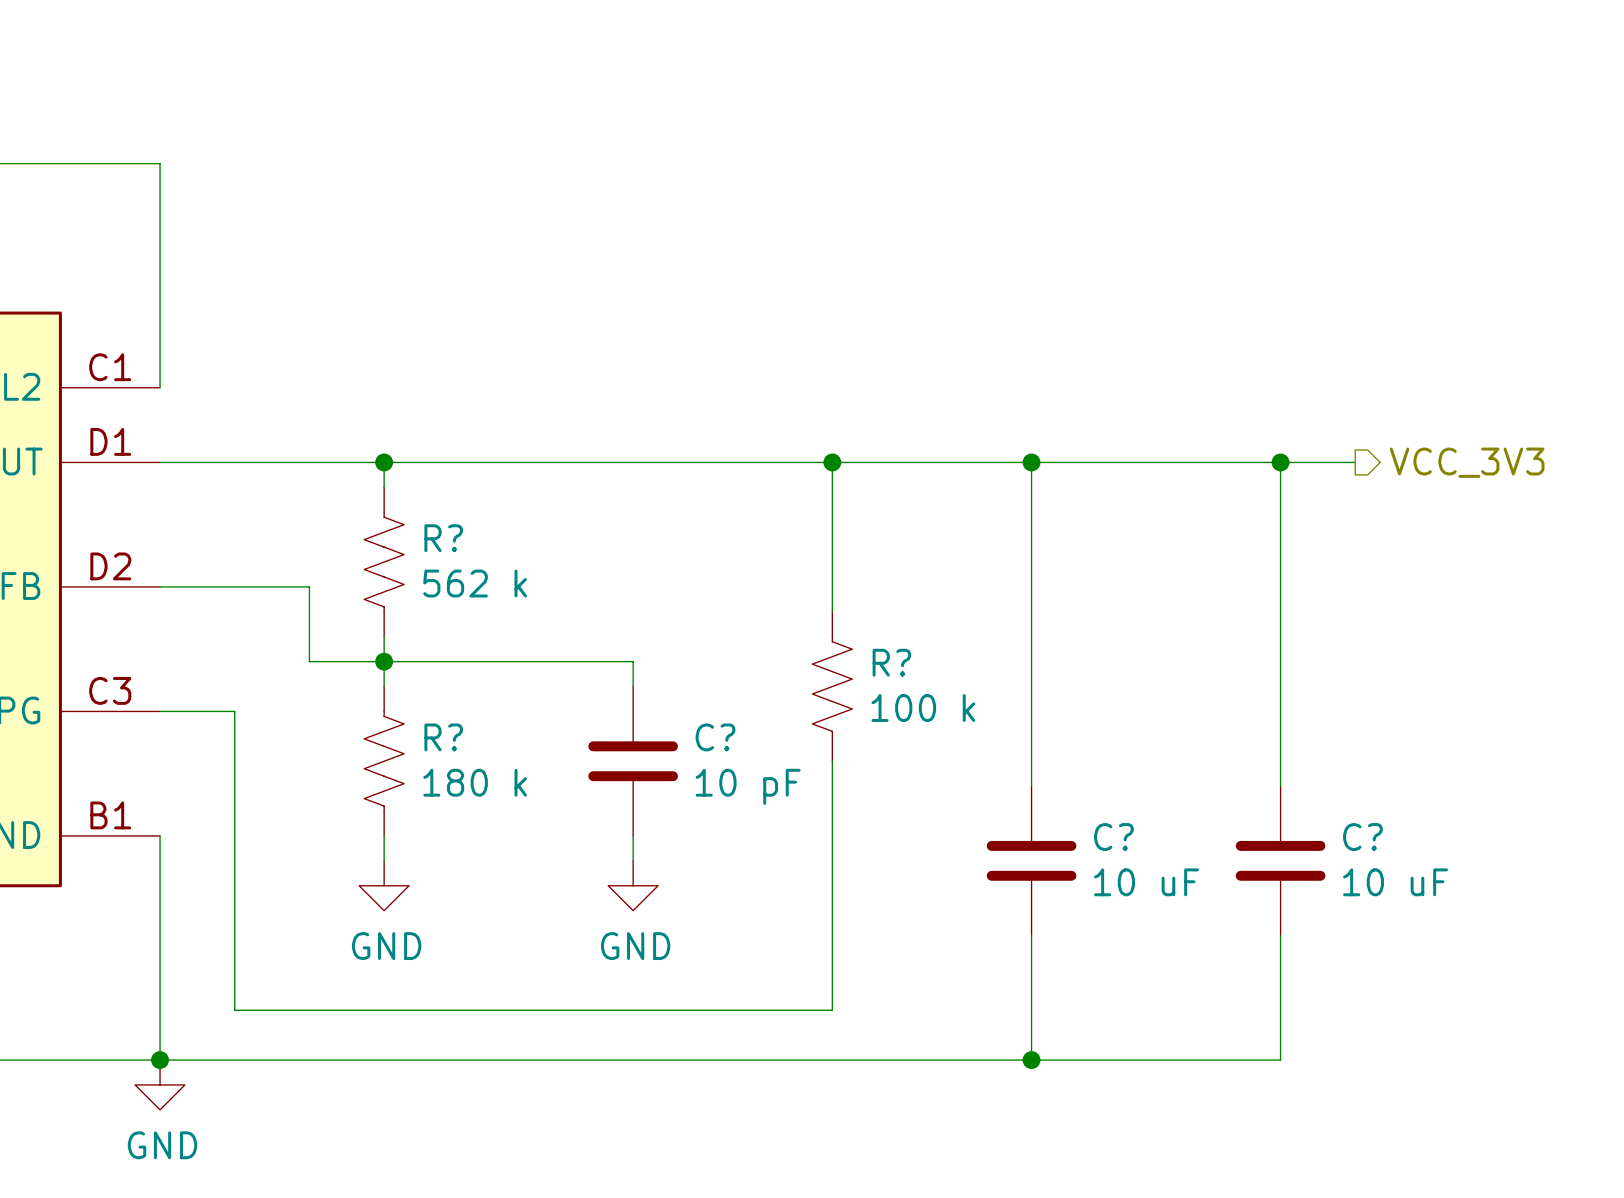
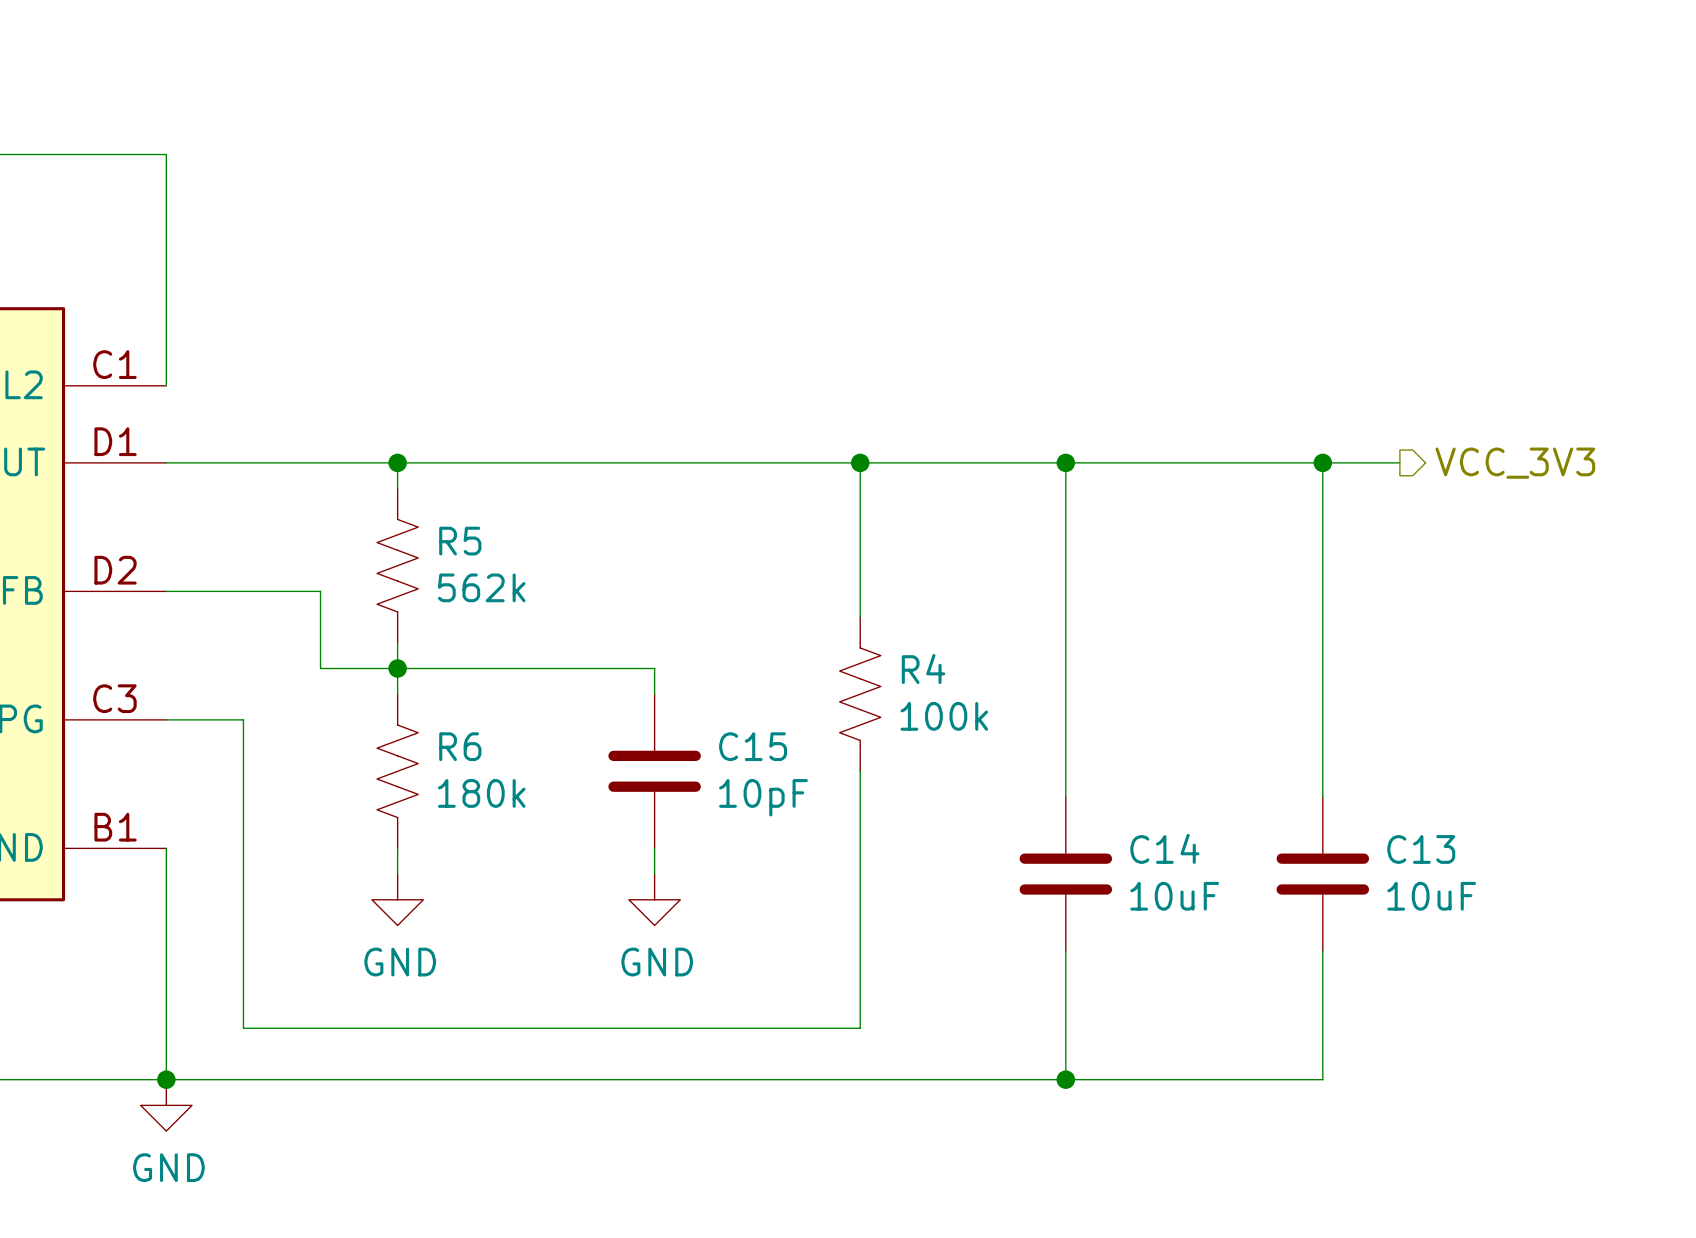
R? name: R? (443, 538) -> R5 (460, 541)
R? value: 562 k (475, 583) -> 562k (481, 587)
R? name: R? (891, 662) -> R4 (923, 668)
R? value: 100 k (923, 708) -> 100k (944, 716)
R? name: R? (443, 737) -> R6 (460, 746)
C? name: C? (715, 737) -> C15 (753, 746)
R? value: 180 k (475, 782) -> 180k (481, 793)
C? value: 10 pF (748, 786) -> 10pF (763, 797)
C? name: C? (1113, 837) -> C14 (1164, 848)
C? name: C? (1362, 837) -> C13 (1421, 849)
C? value: 10 uF (1146, 882) -> 10uF (1174, 896)
C? value: 10 uF (1395, 882) -> 10uF (1431, 896)

